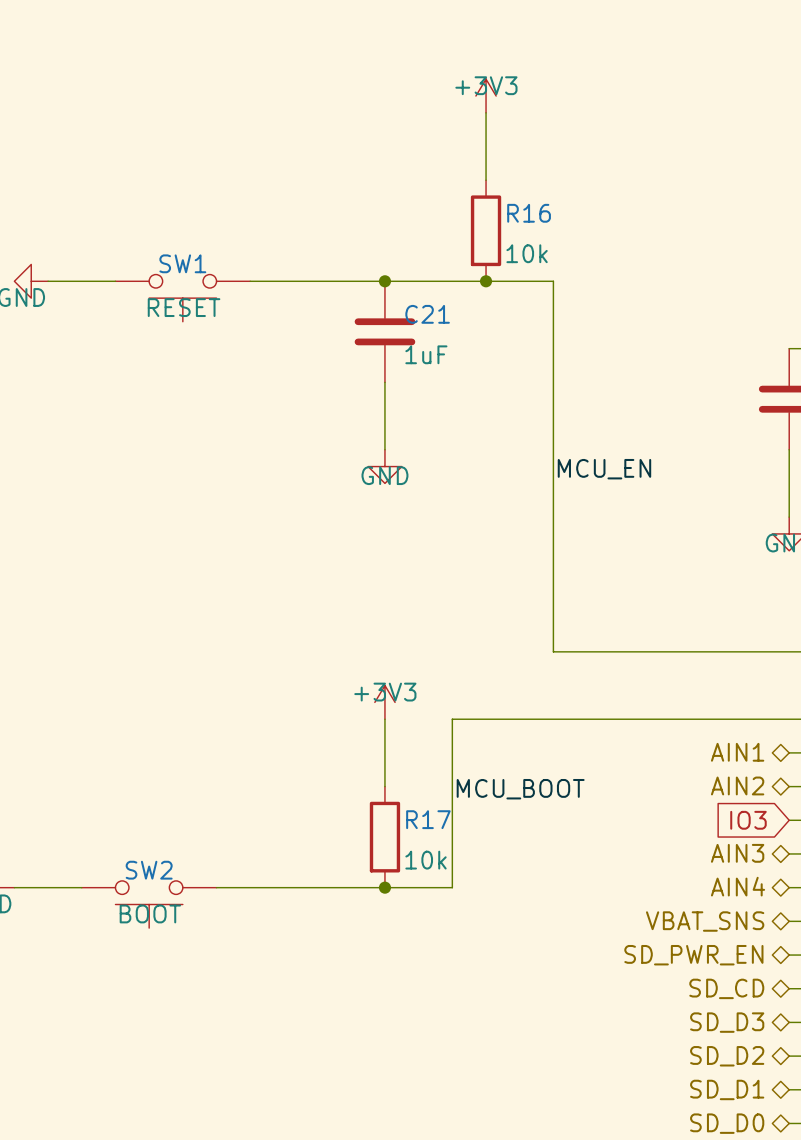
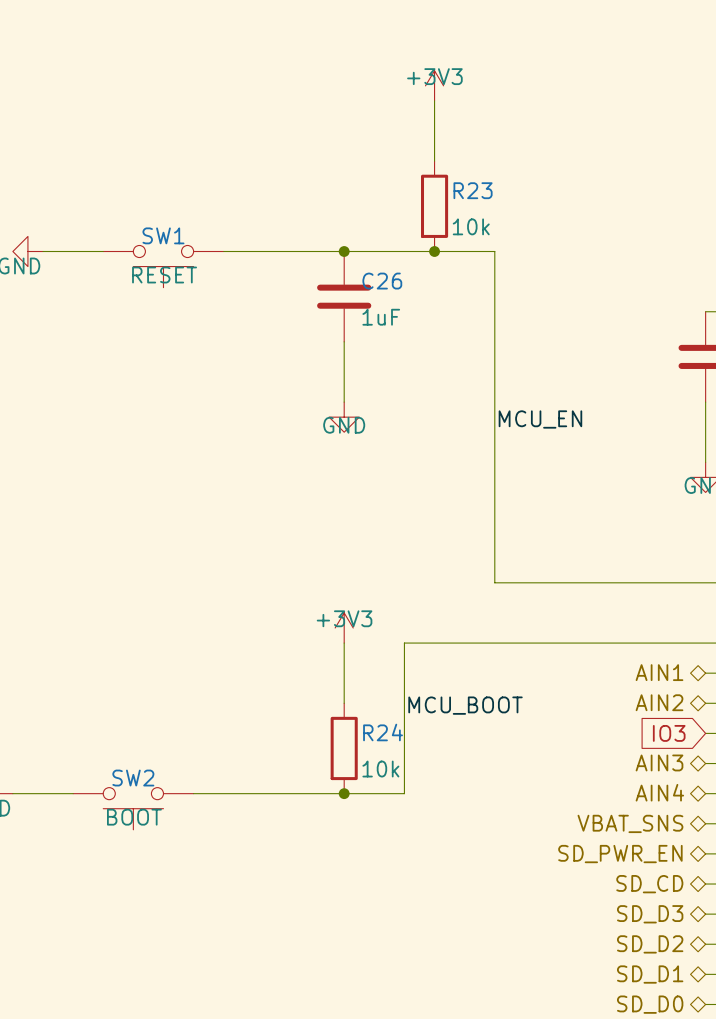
R16 name: R16 (529, 213) -> R23 (473, 190)
C21 name: C21 (427, 314) -> C26 (382, 281)
R17 name: R17 (428, 819) -> R24 (383, 732)

